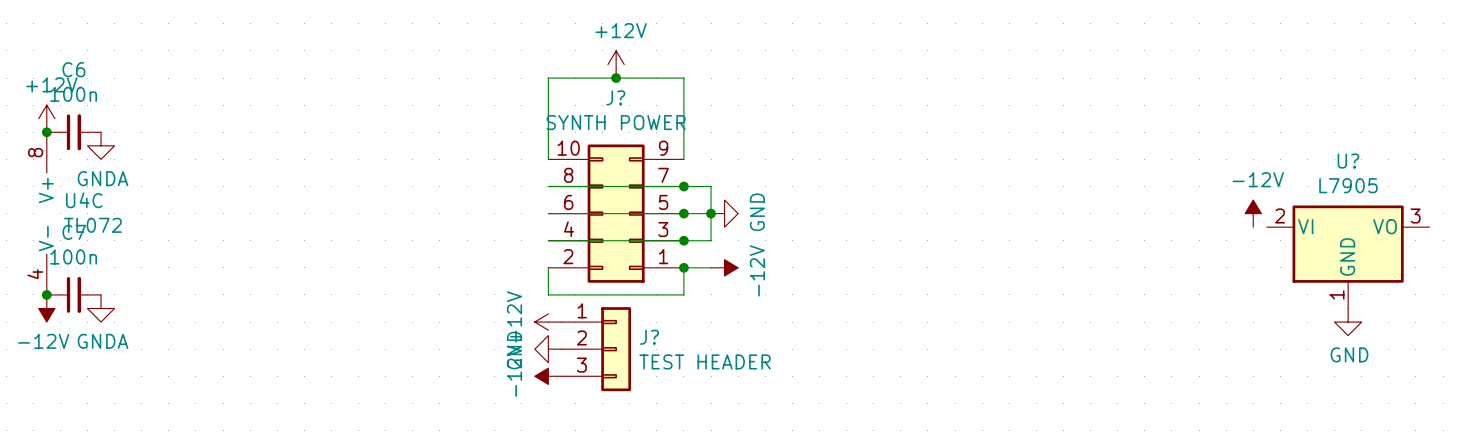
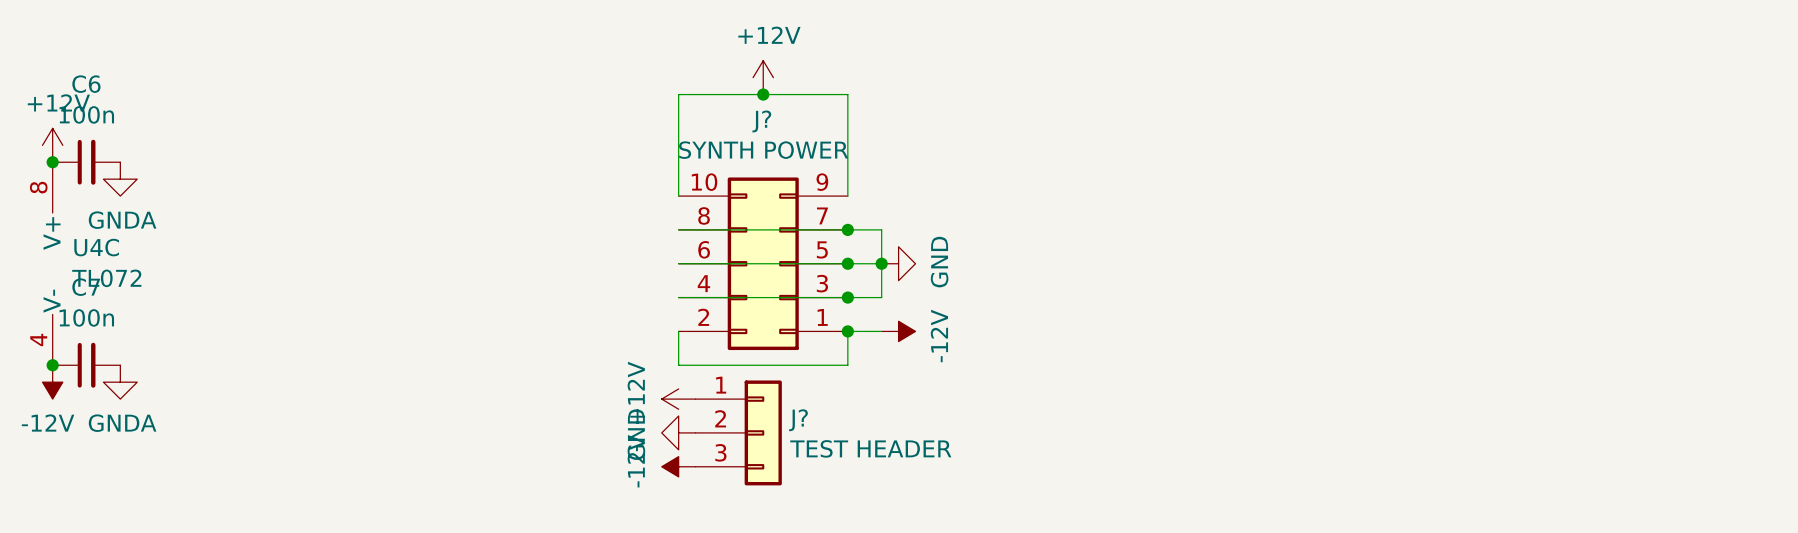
power symbol: -12V (1253, 213) -> none
U?: L7905 (1348, 256) -> none
power symbol: GND (1348, 322) -> none

